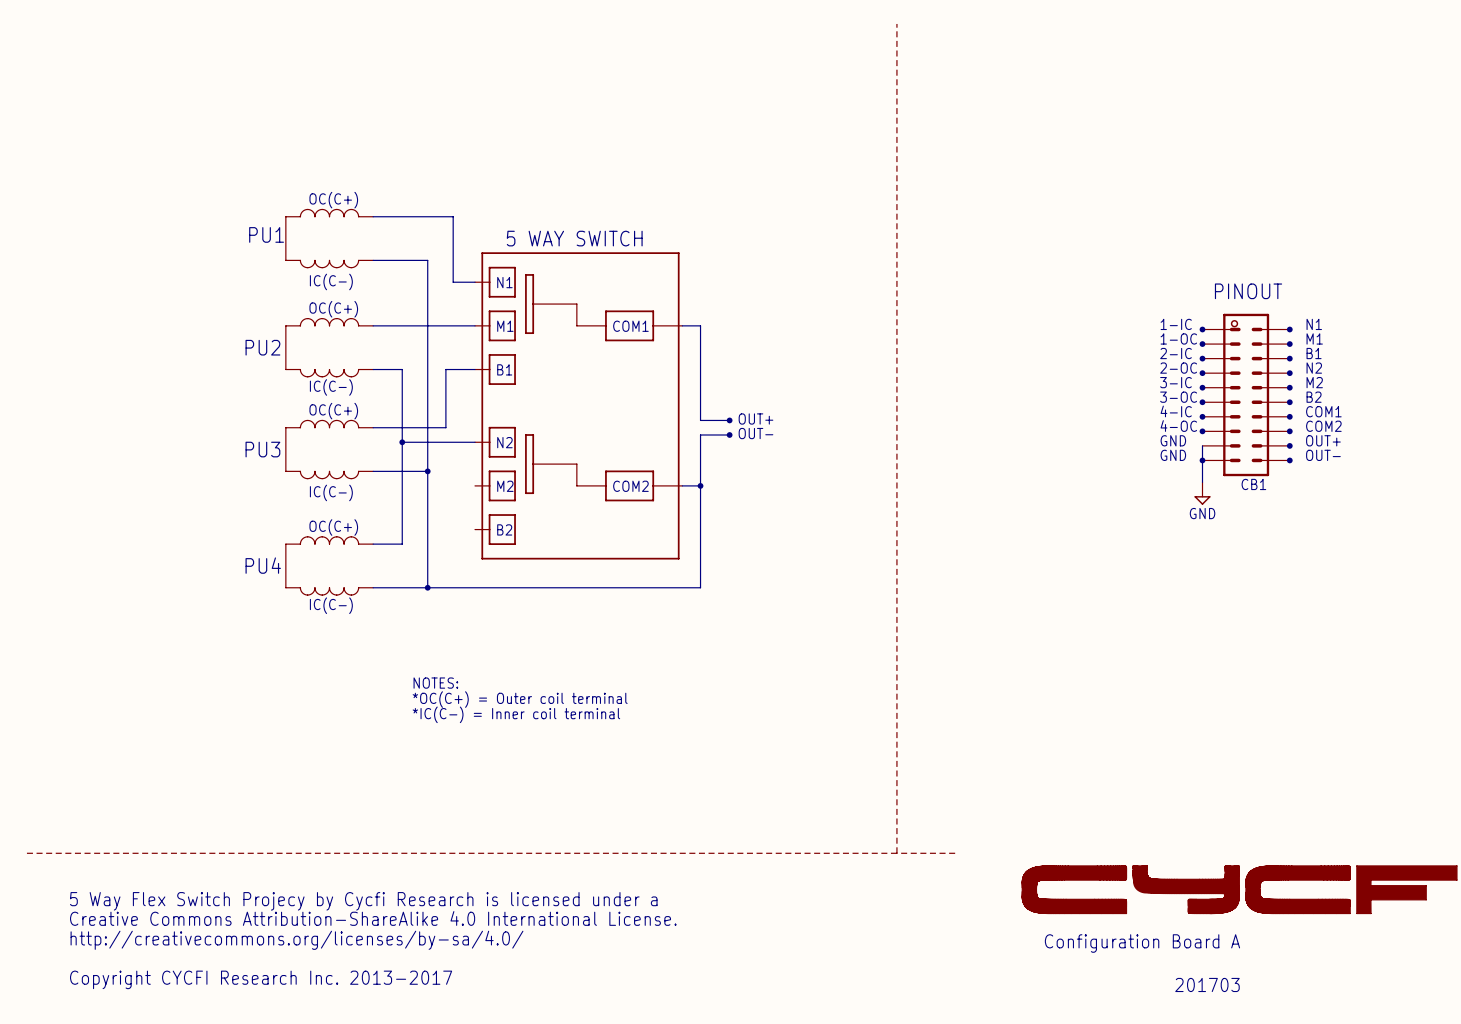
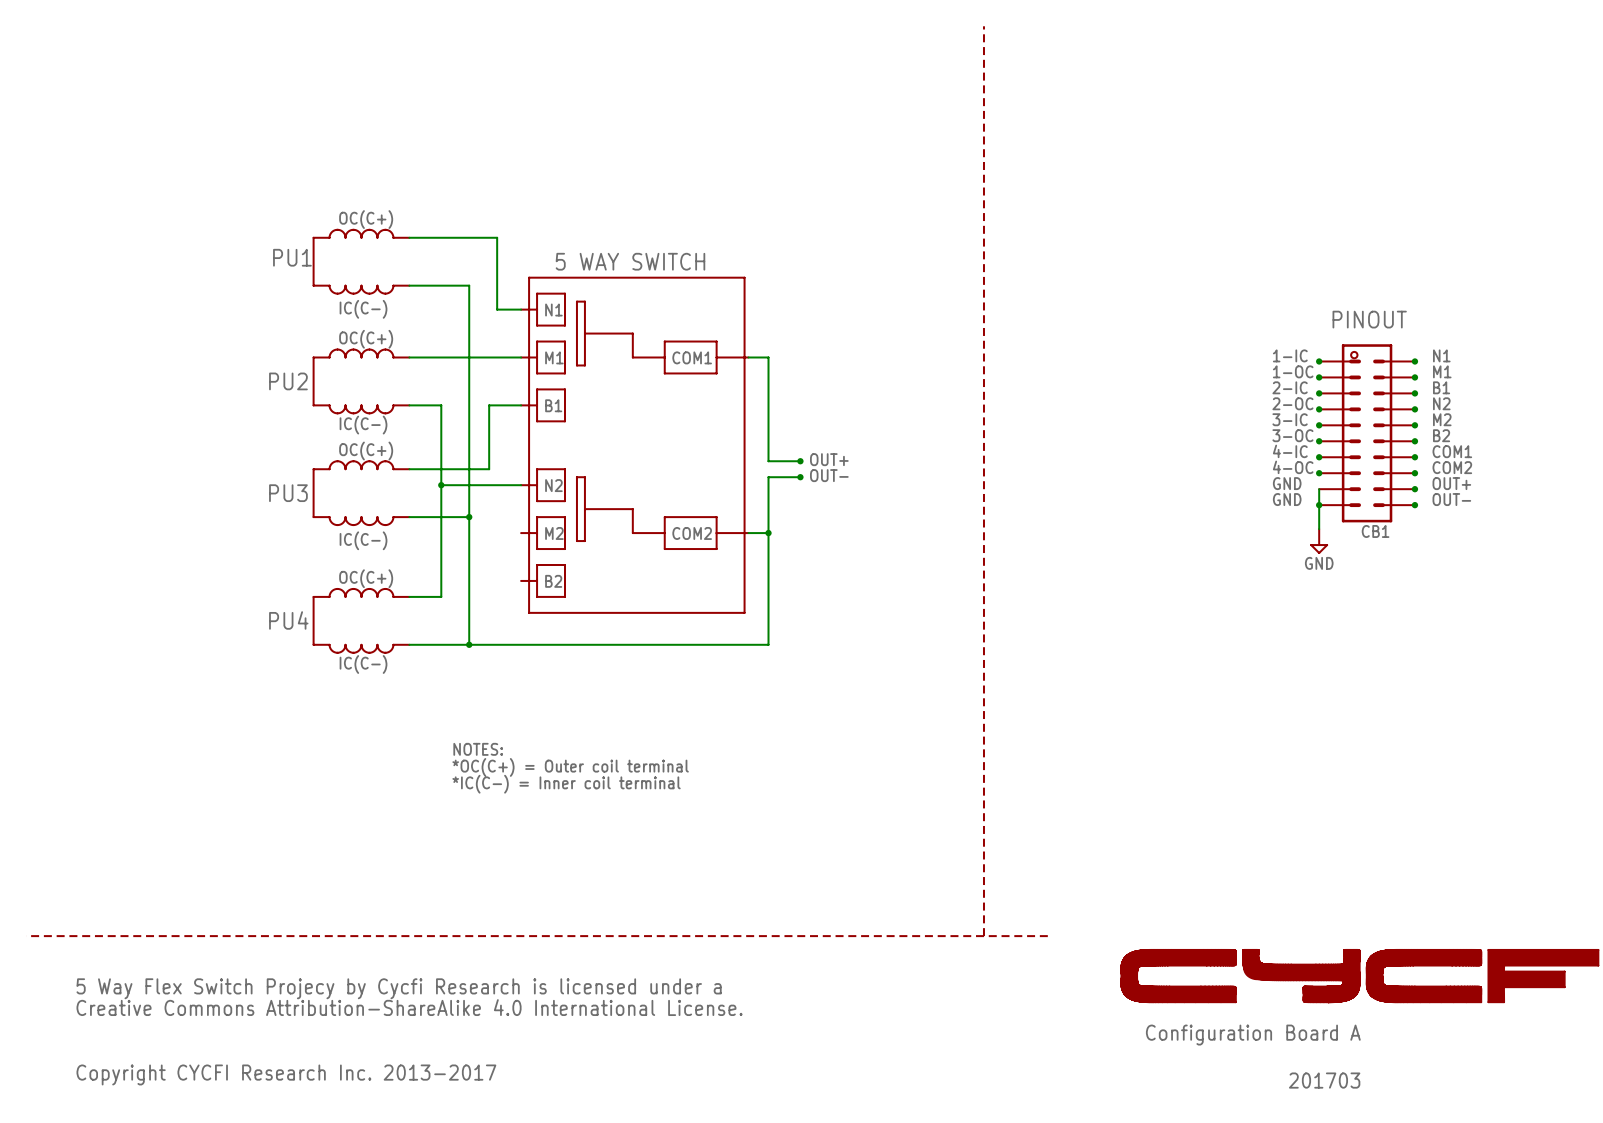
text: http://creativecommons.org/licenses/by-sa/4.0/ (296, 940) -> none

